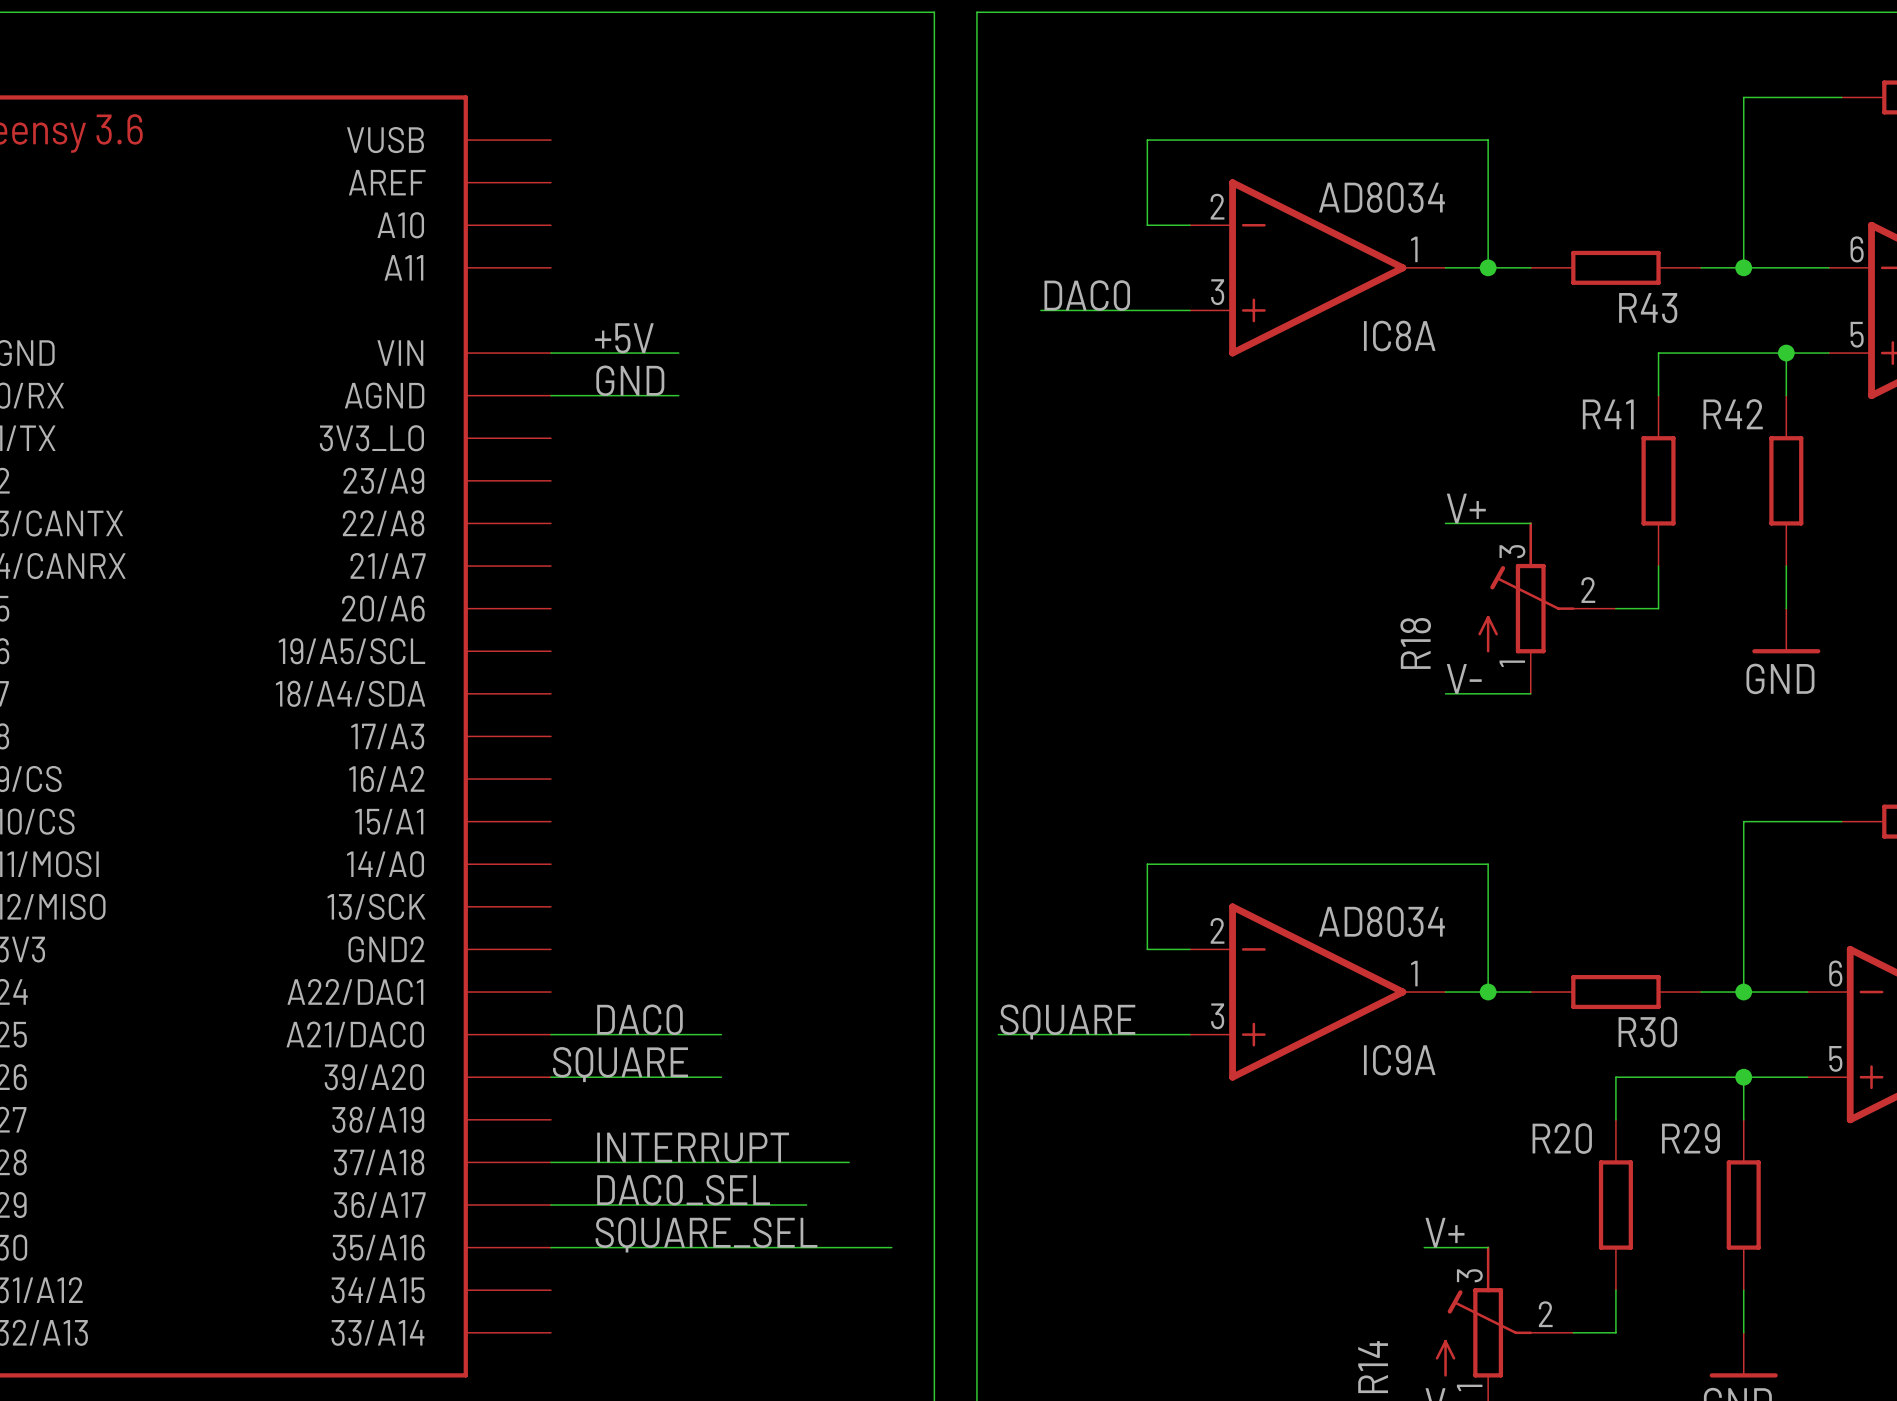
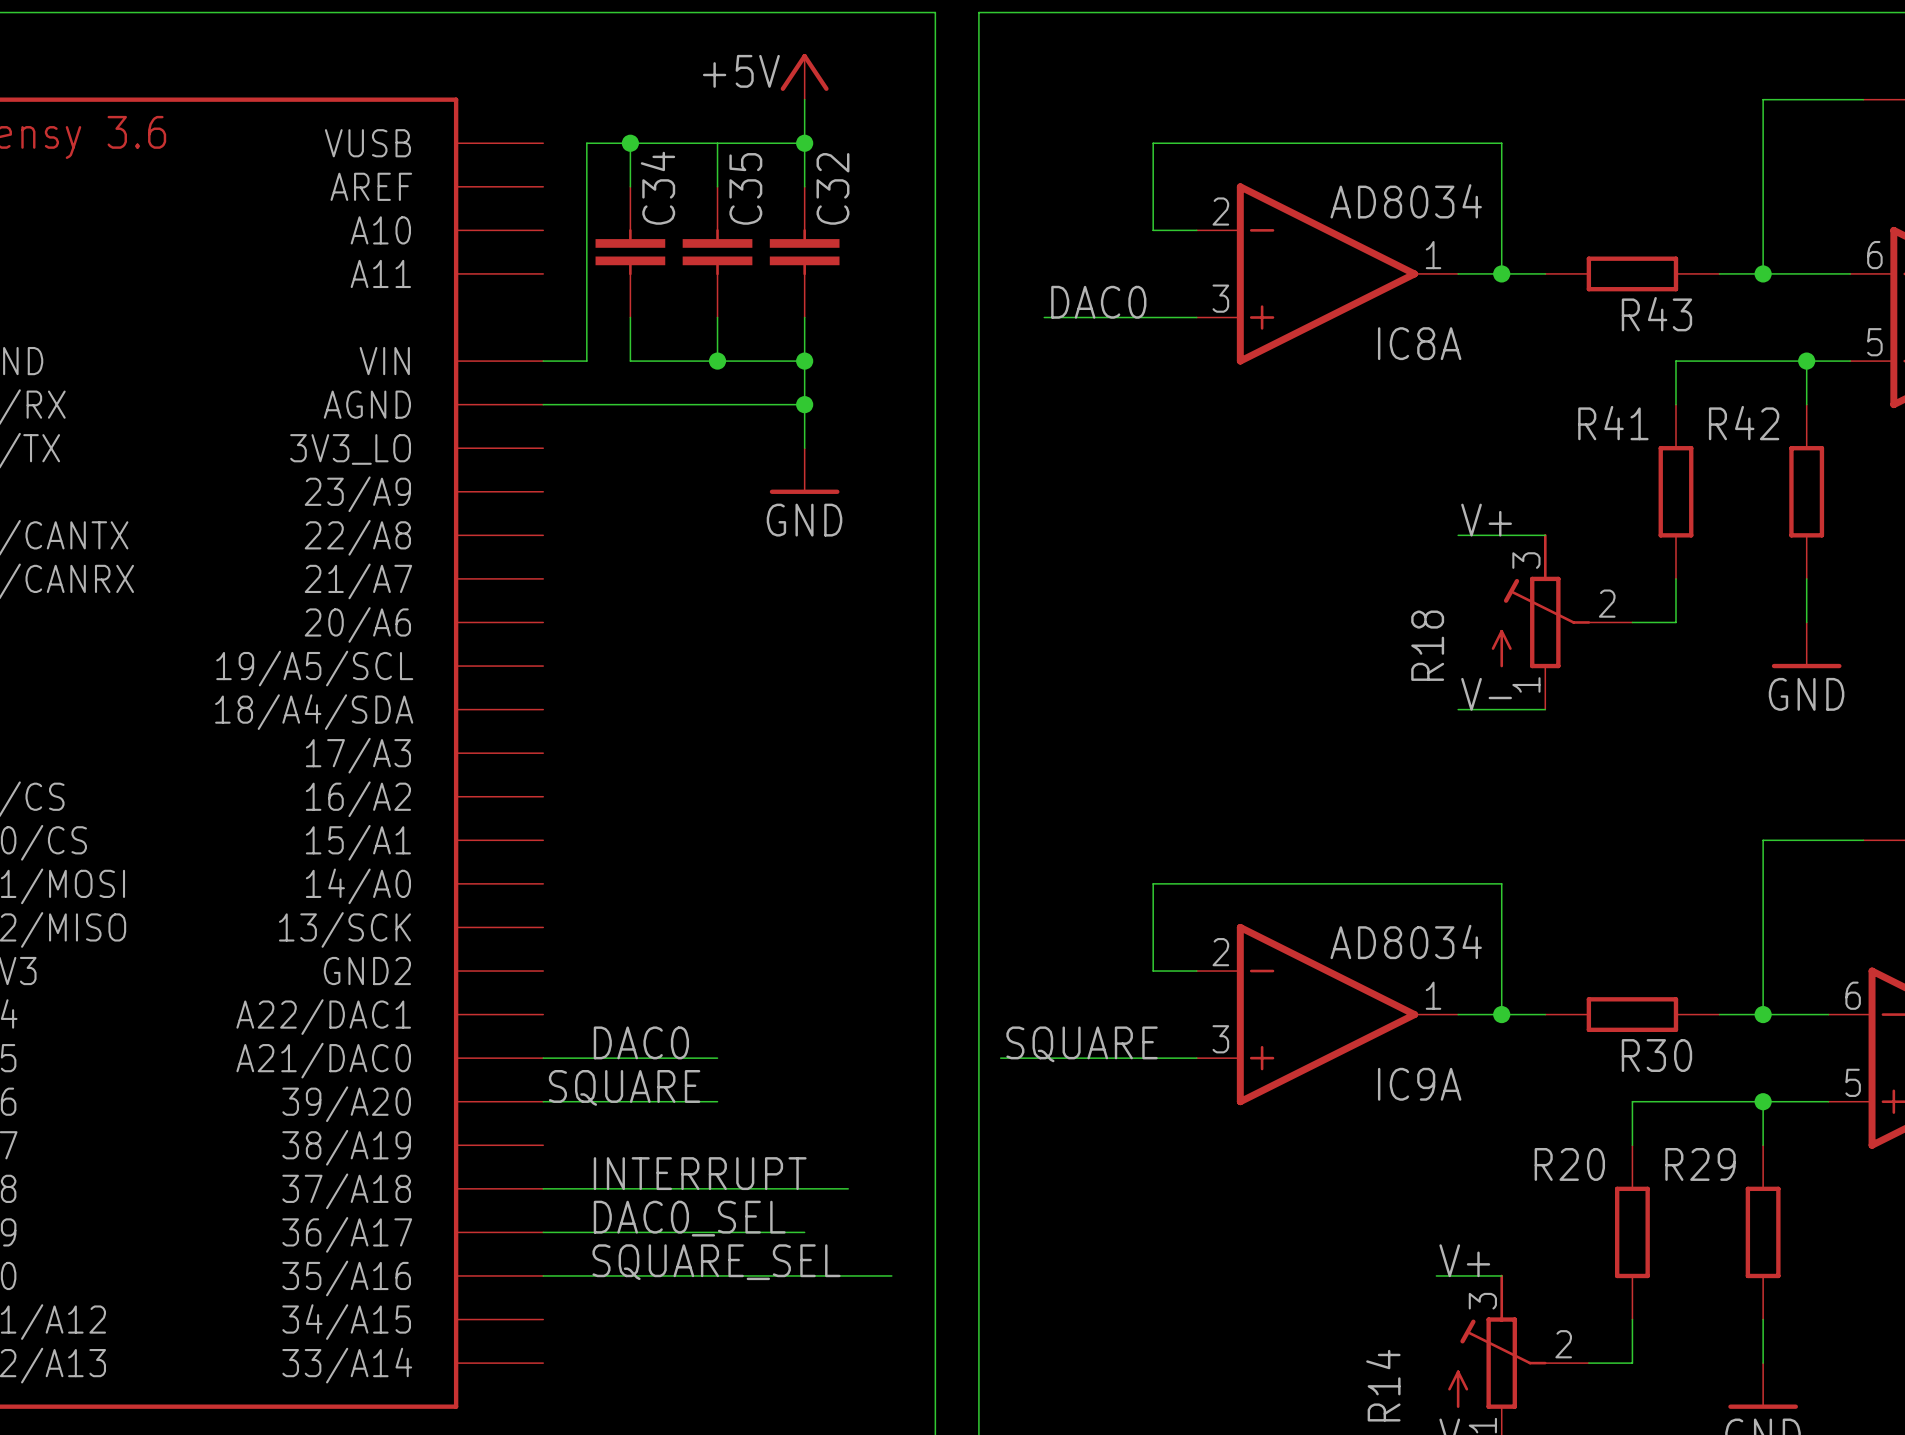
power symbol: none -> +5V (804, 76)
wire: none -> (804, 99) (804, 186)
wire: none -> (630, 143) (630, 186)
junction: none -> (630, 143)
wire: none -> (717, 143) (717, 186)
wire: none -> (804, 143) (586, 143) (586, 361)
junction: none -> (804, 143)
C34: none -> (630, 252)
C35: none -> (717, 252)
C32: none -> (804, 252)
wire: none -> (717, 317) (717, 361)
wire: none -> (804, 317) (804, 448)
label: +5V (624, 338) -> none
wire: (593, 353) (636, 353) -> (630, 317) (630, 361)
wire: none -> (673, 361) (804, 361)
junction: none -> (717, 361)
junction: none -> (804, 361)
label: GND (630, 380) -> none
wire: none -> (673, 404) (804, 404)
junction: none -> (804, 404)
power symbol: none -> GND (804, 471)

